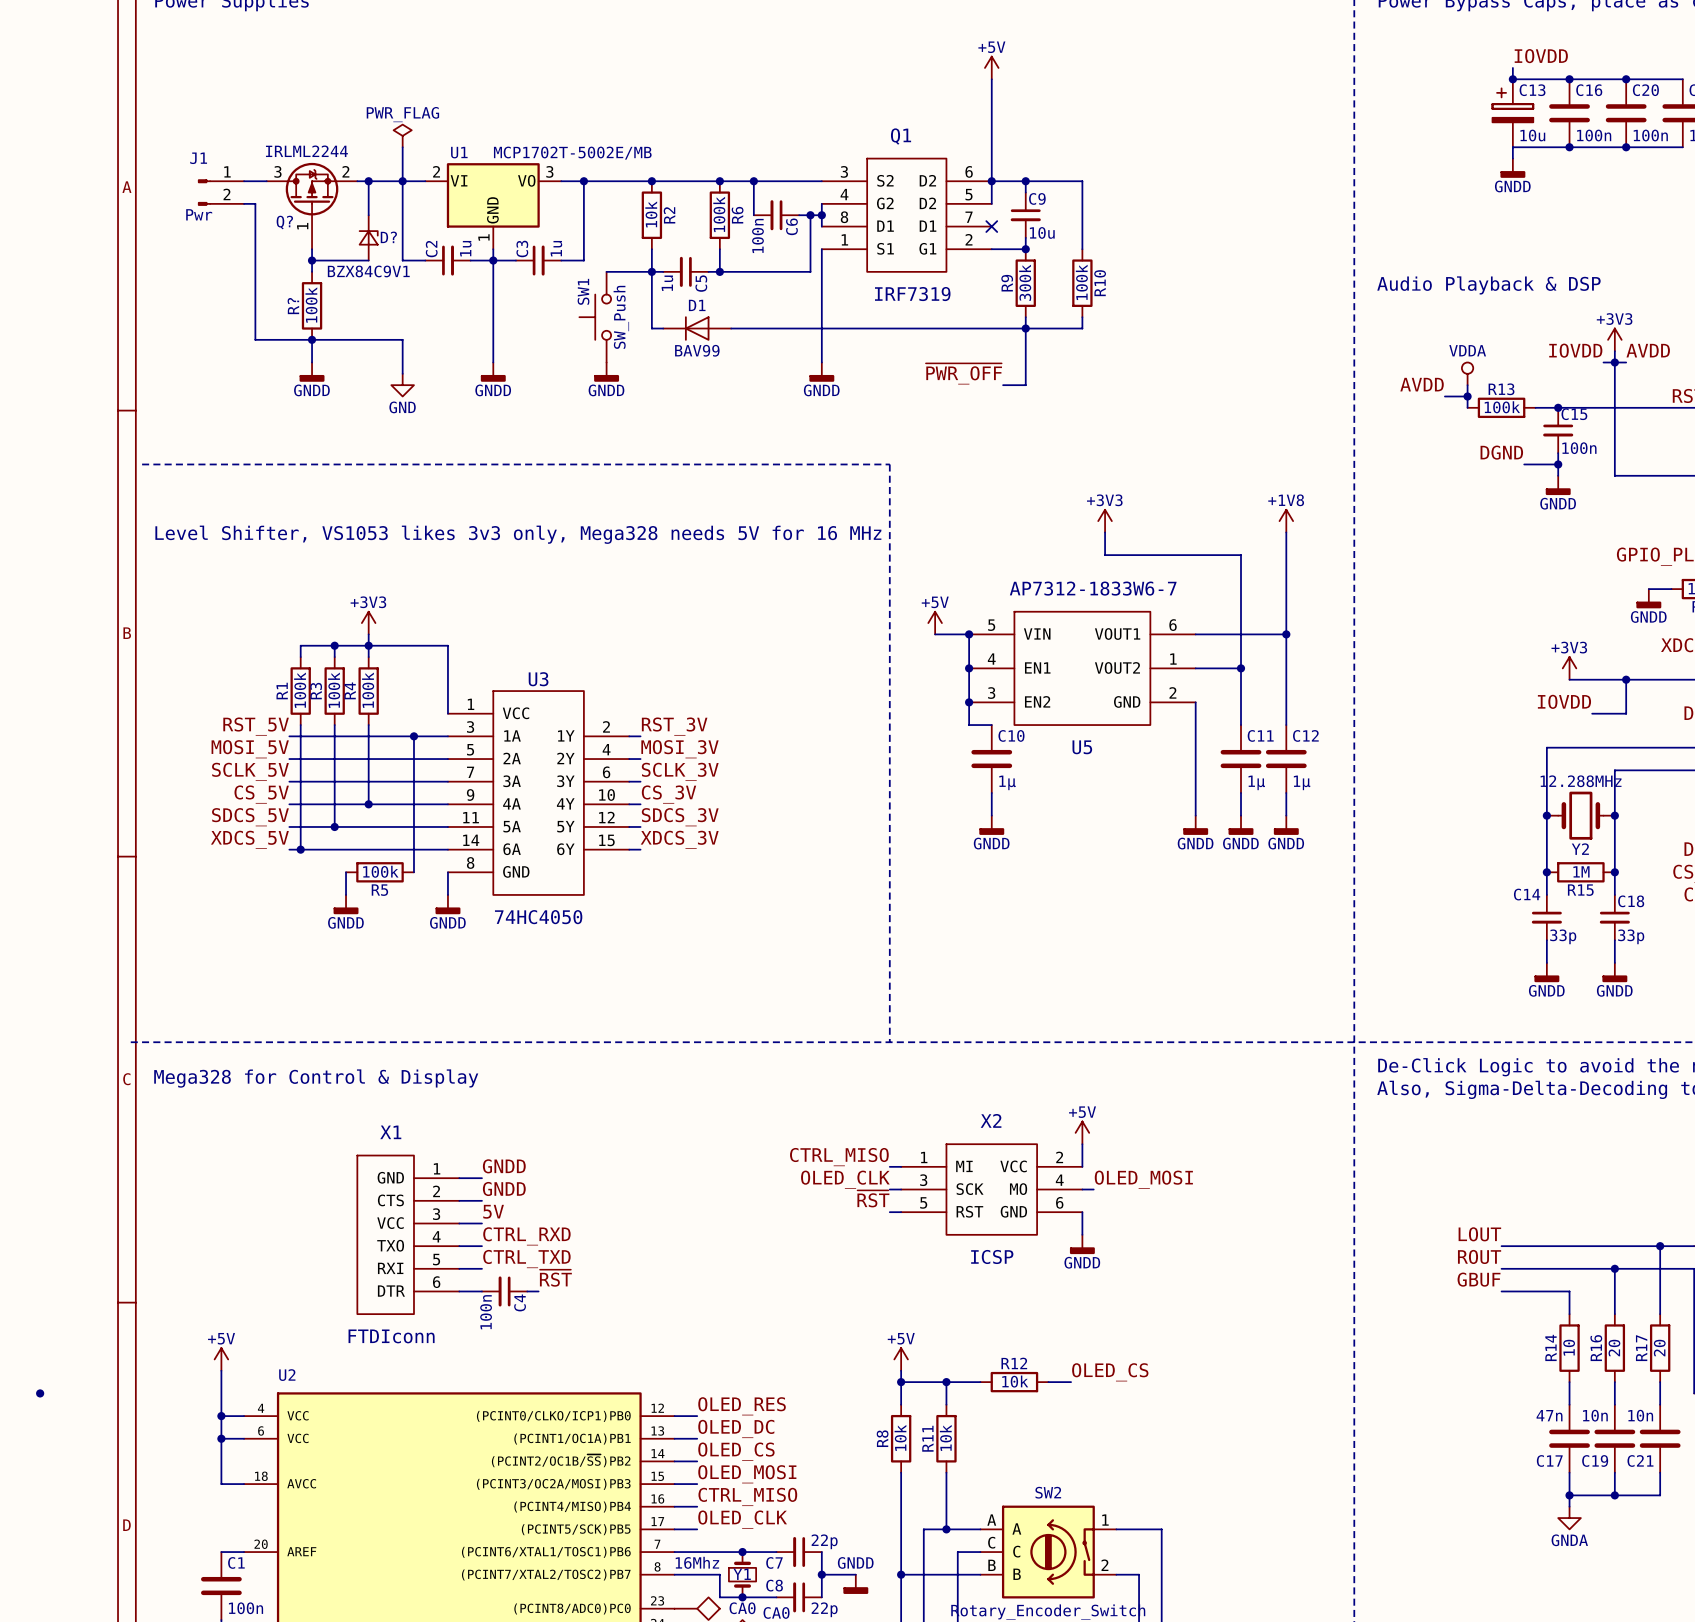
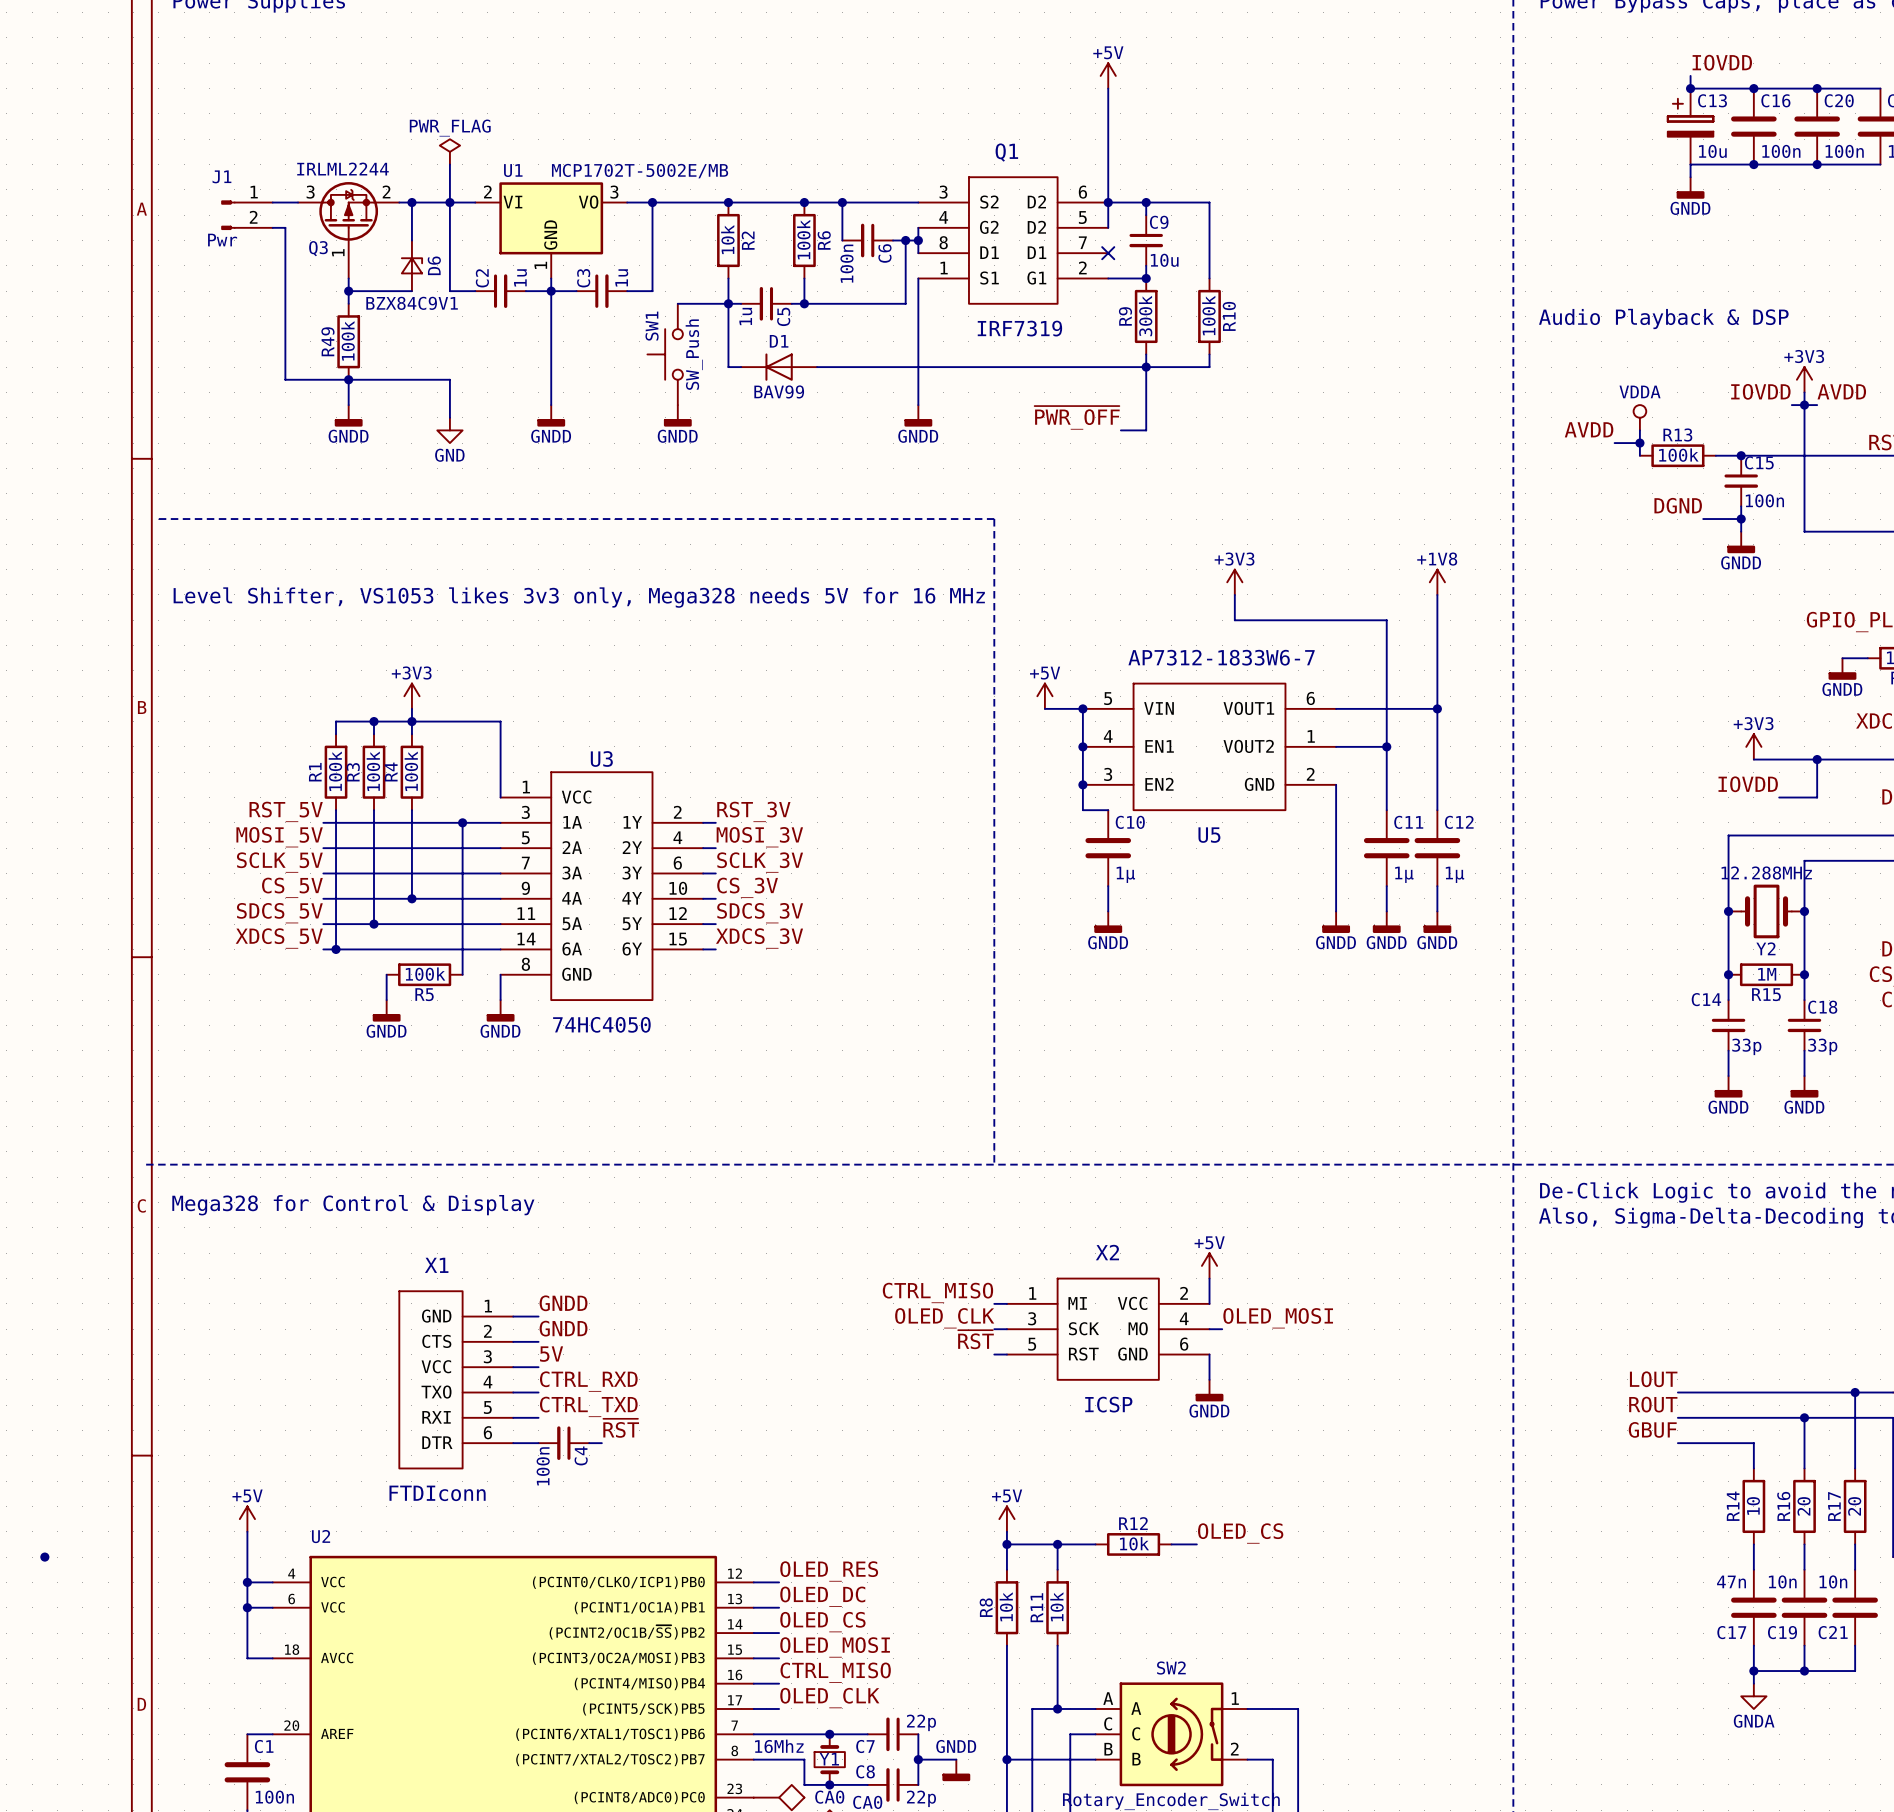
Q? name: Q? (284, 222) -> Q3 (318, 248)
D? name: D? (388, 237) -> D6 (434, 265)
R? name: R? (293, 306) -> R49 (327, 341)

